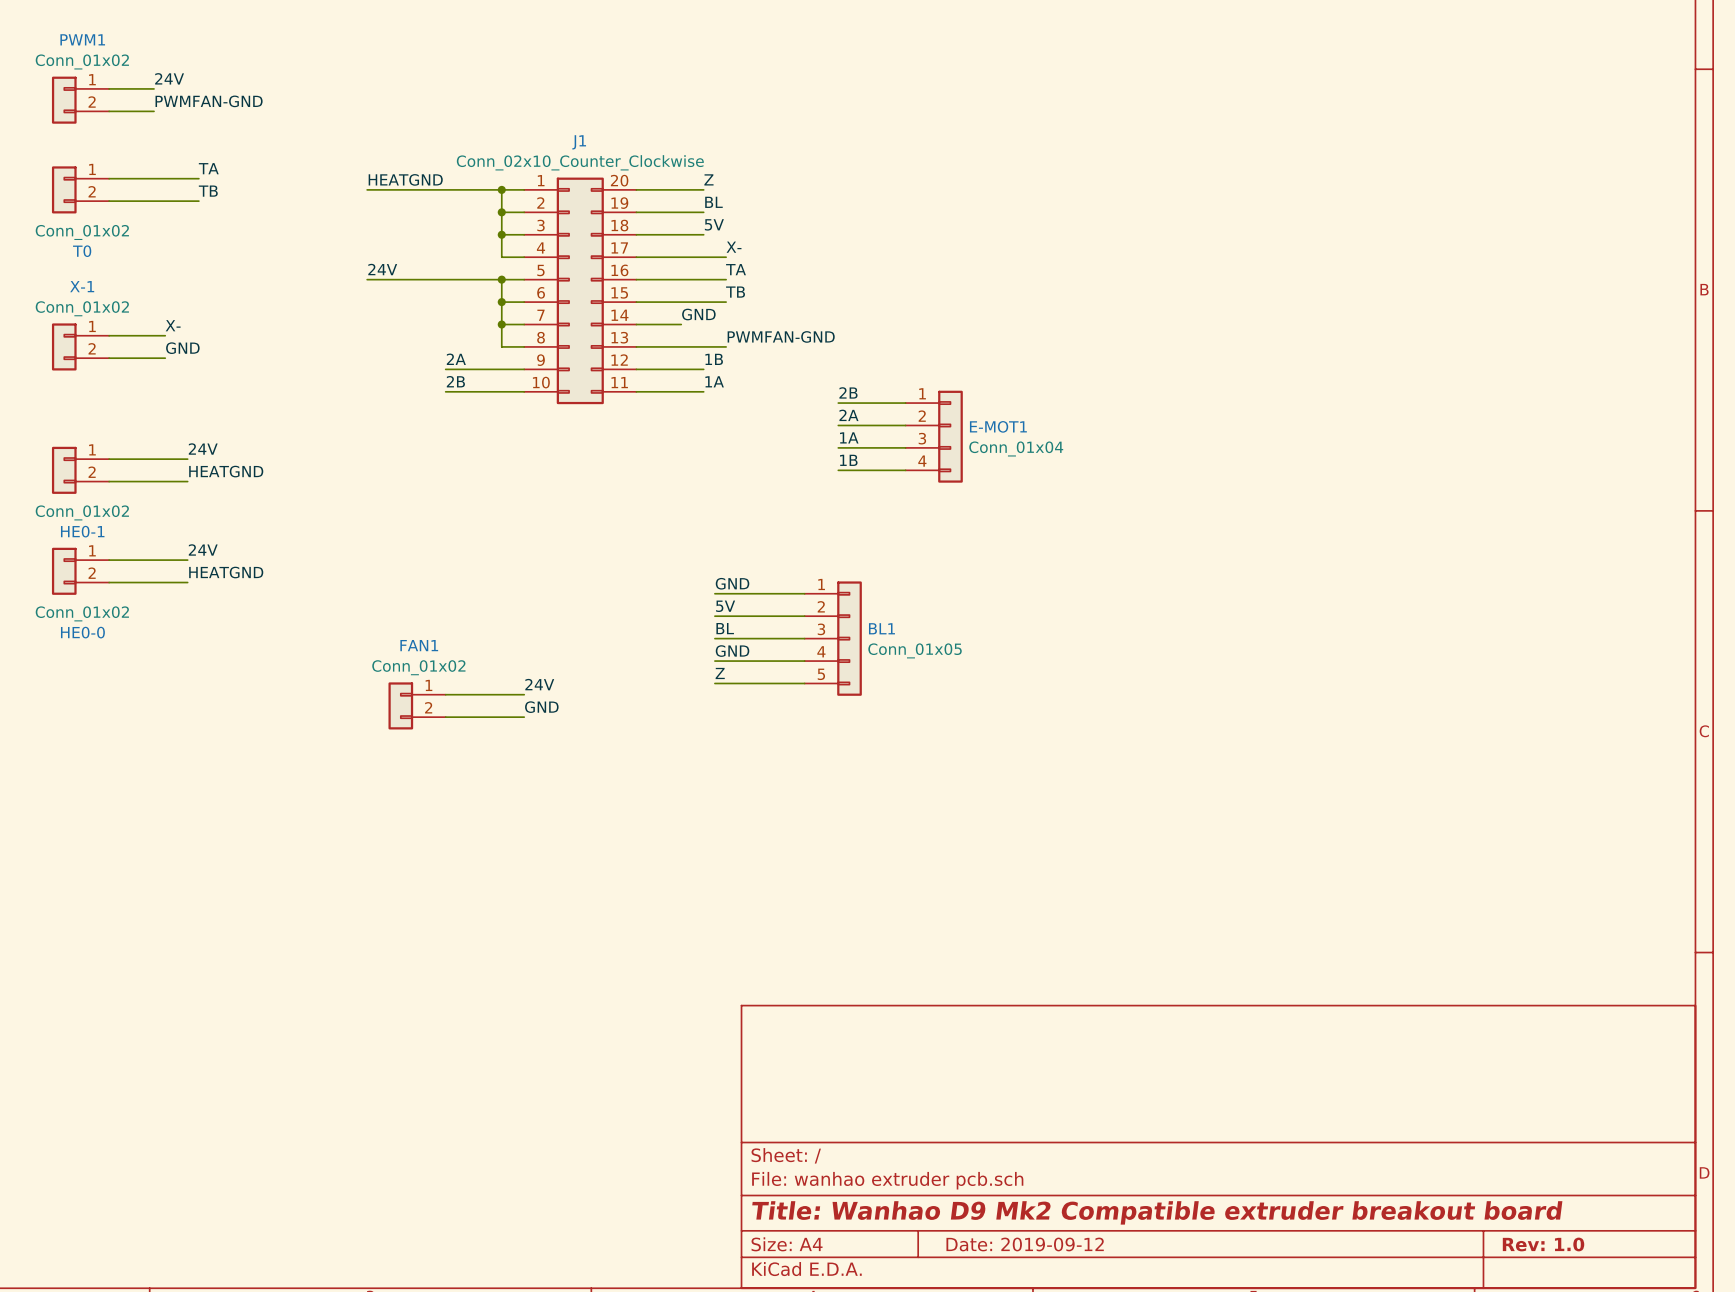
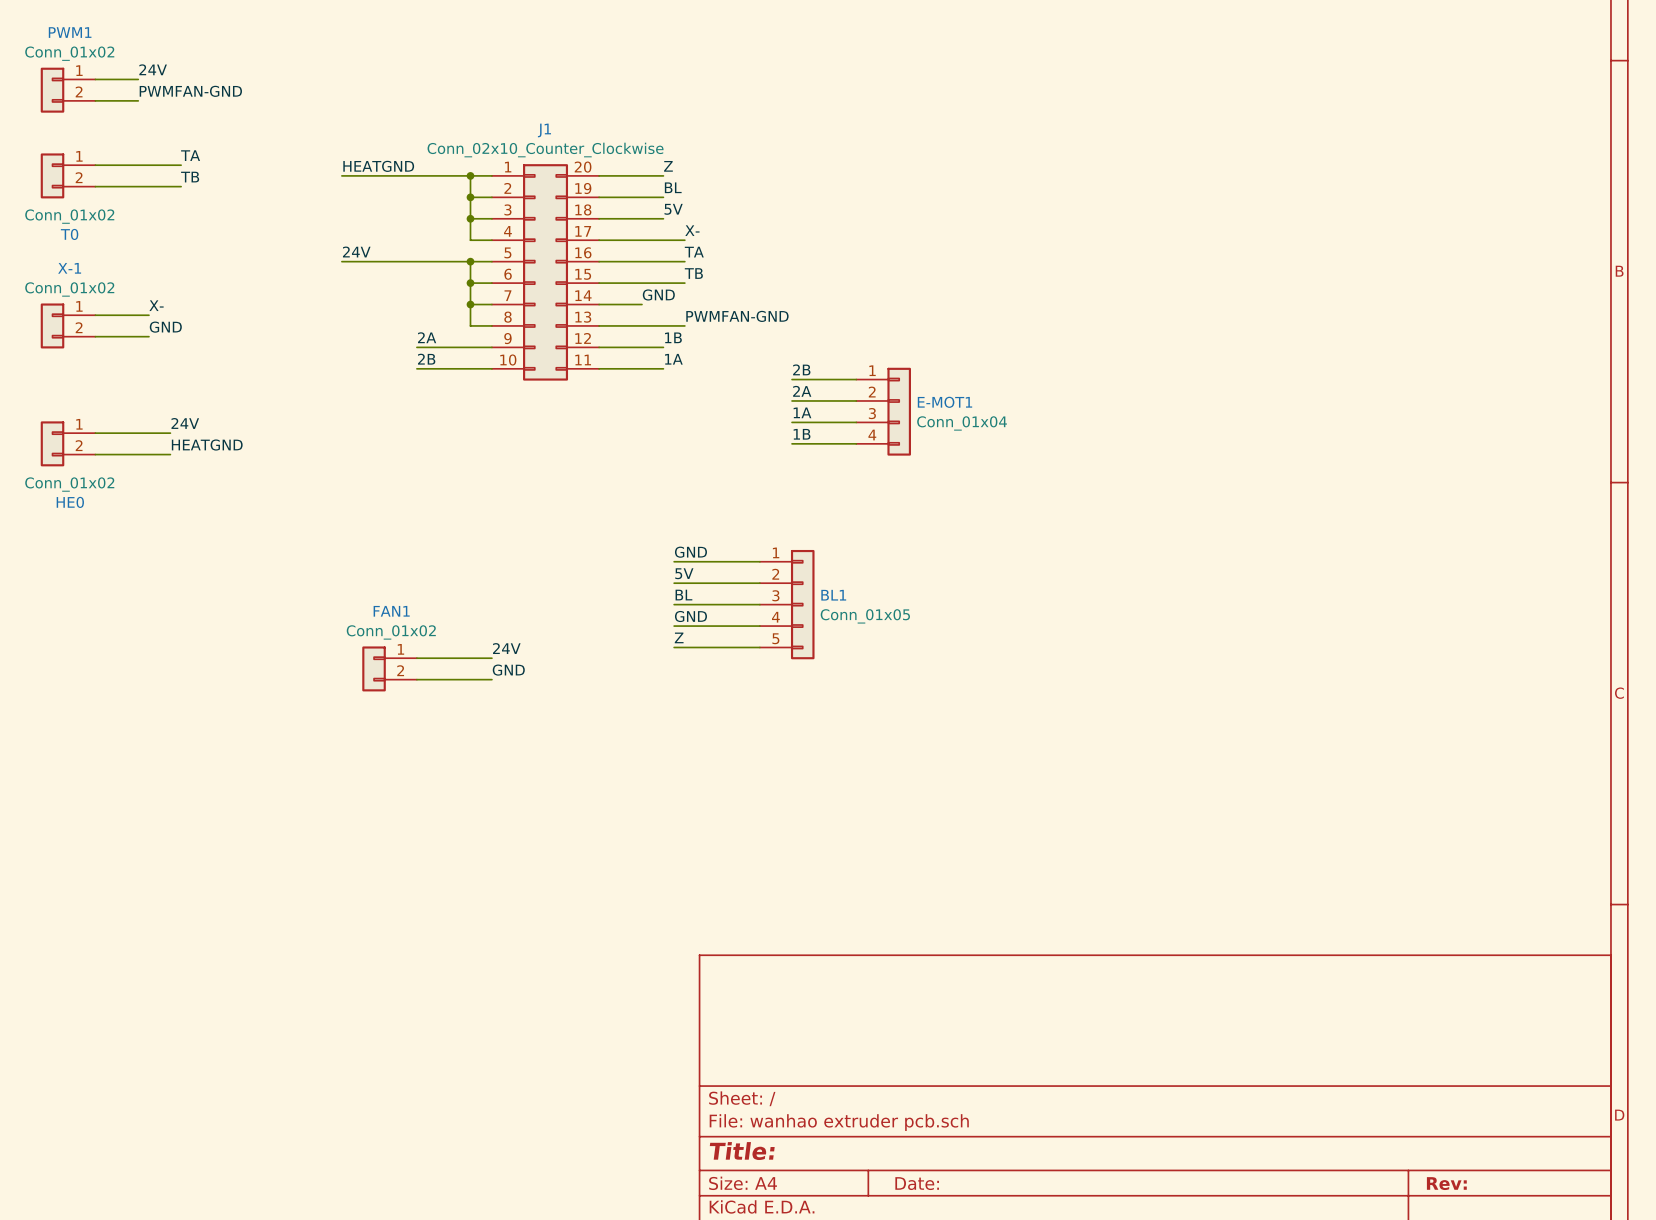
HE0-1 name: HE0-1 (82, 531) -> HE0 (70, 502)
label: 24V (203, 549) -> none
wire: (109, 560) (187, 560) -> none
HE0-0: Conn_01x02 (80, 571) -> none
label: HEATGND (226, 572) -> none
wire: (109, 582) (187, 582) -> none
title block: Title: Wanhao D9 Mk2 Compatible extruder breakout board (1157, 1212) -> Title: (742, 1151)
title block: Date: 2019-09-12 (1025, 1244) -> Date: (917, 1183)
title block: Rev: 1.0 (1543, 1244) -> Rev: (1446, 1183)

